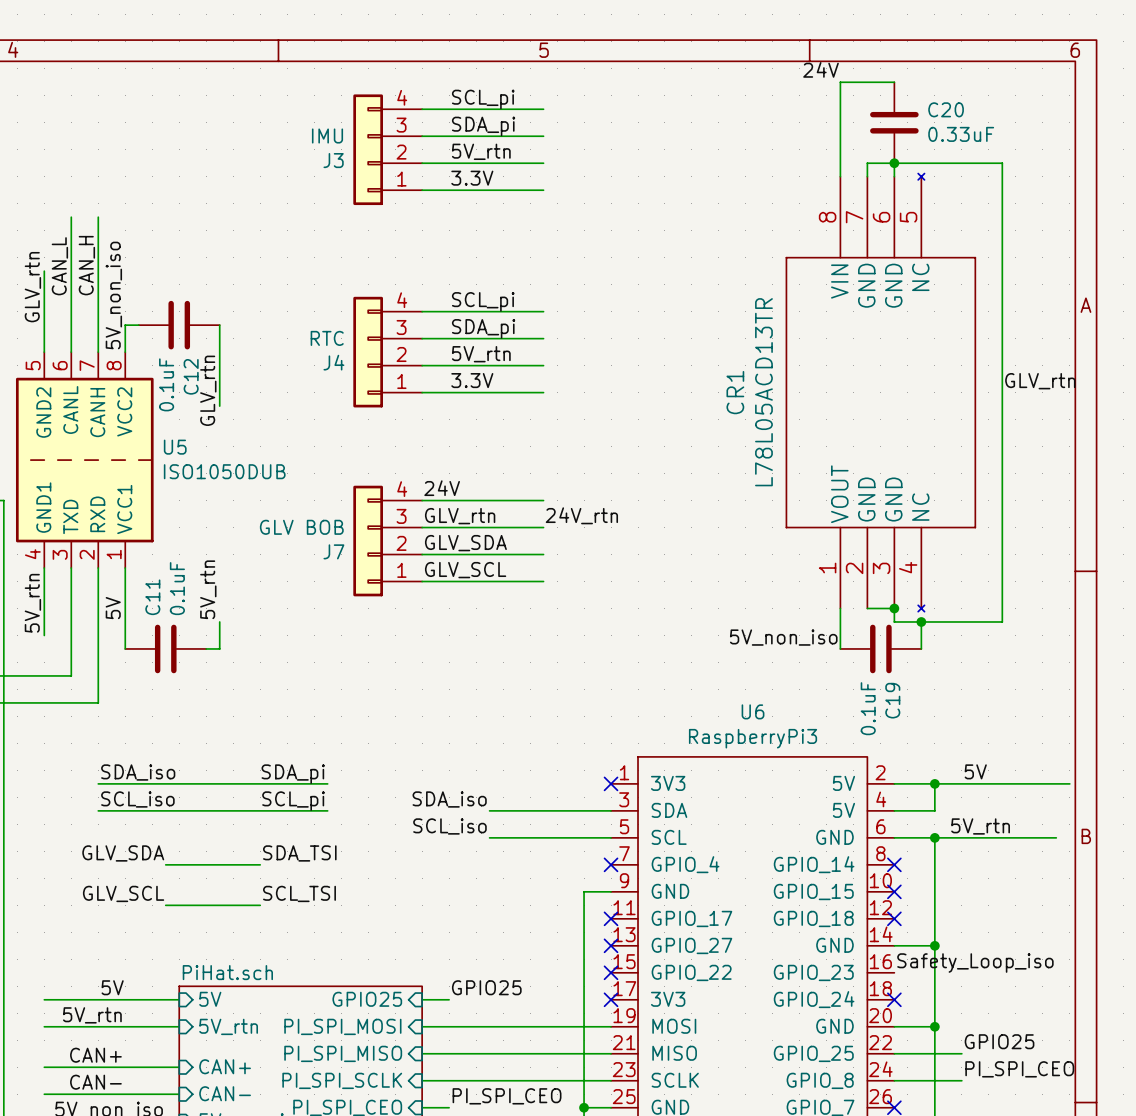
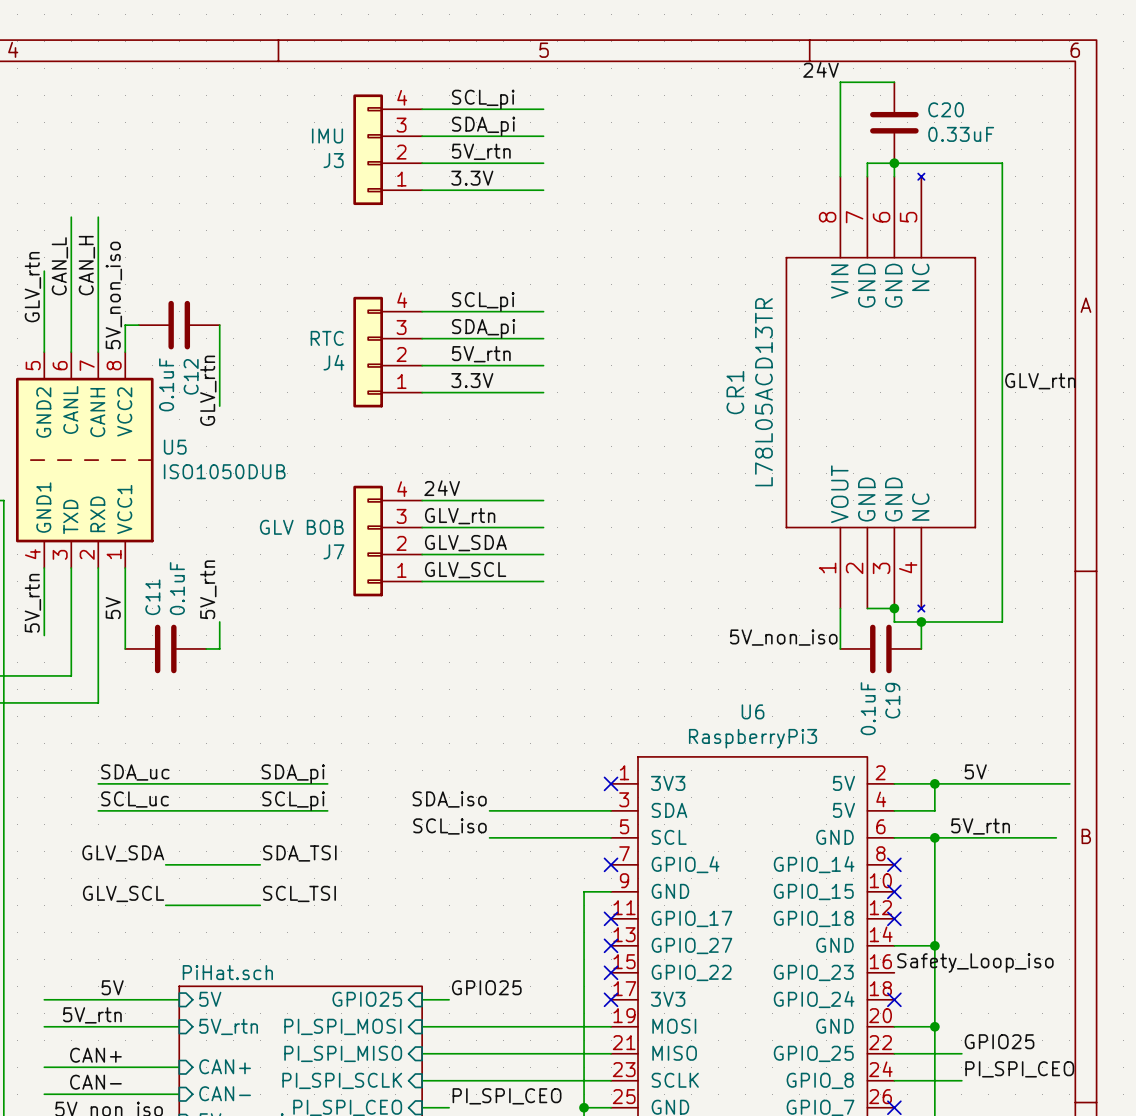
label: 24V_rtn (581, 515) -> none
label: SDA_iso (138, 772) -> SDA_uc (135, 772)
label: SCL_iso (137, 799) -> SCL_uc (135, 799)

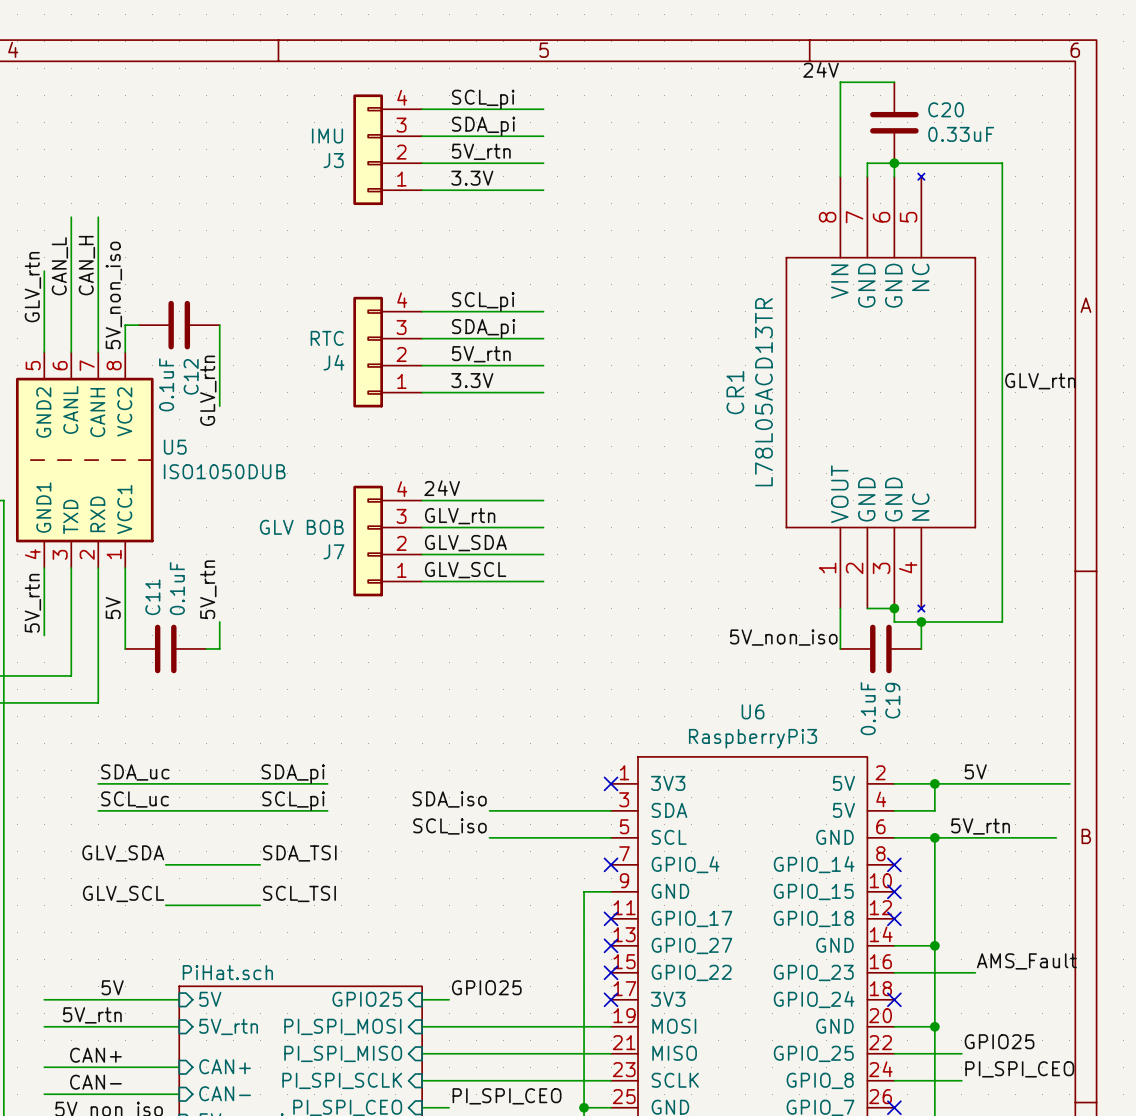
label: none -> AMS_Fault (1026, 961)
label: Safety_Loop_iso (975, 963) -> none
wire: none -> (894, 972) (975, 972)

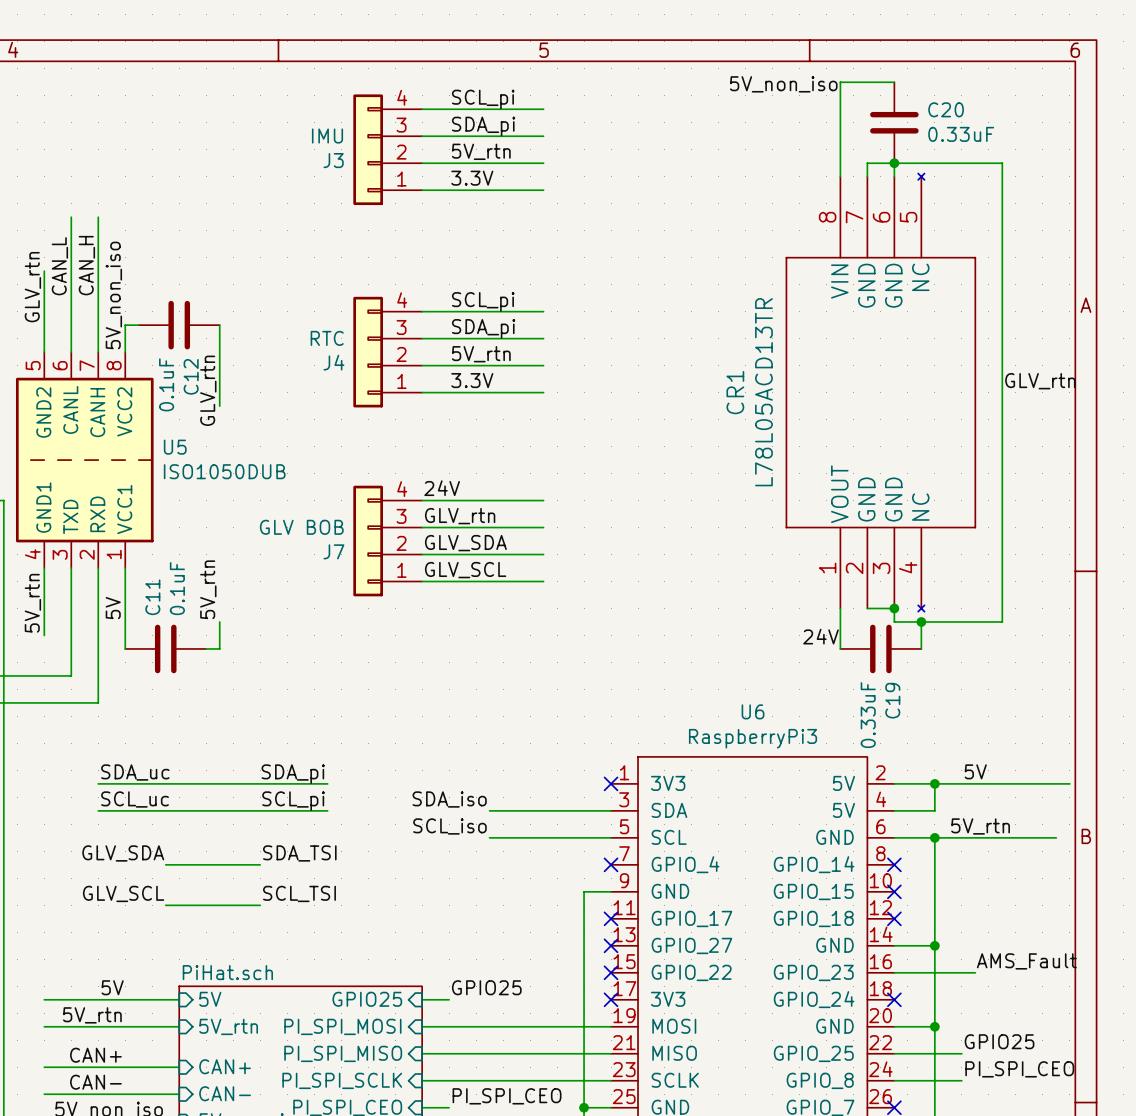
label: 24V (821, 69) -> none
label: none -> 5V_non_iso (783, 84)
label: 5V_non_iso (783, 637) -> 24V (821, 636)
C19 value: 0.1uF (868, 708) -> 0.33uF (868, 715)

